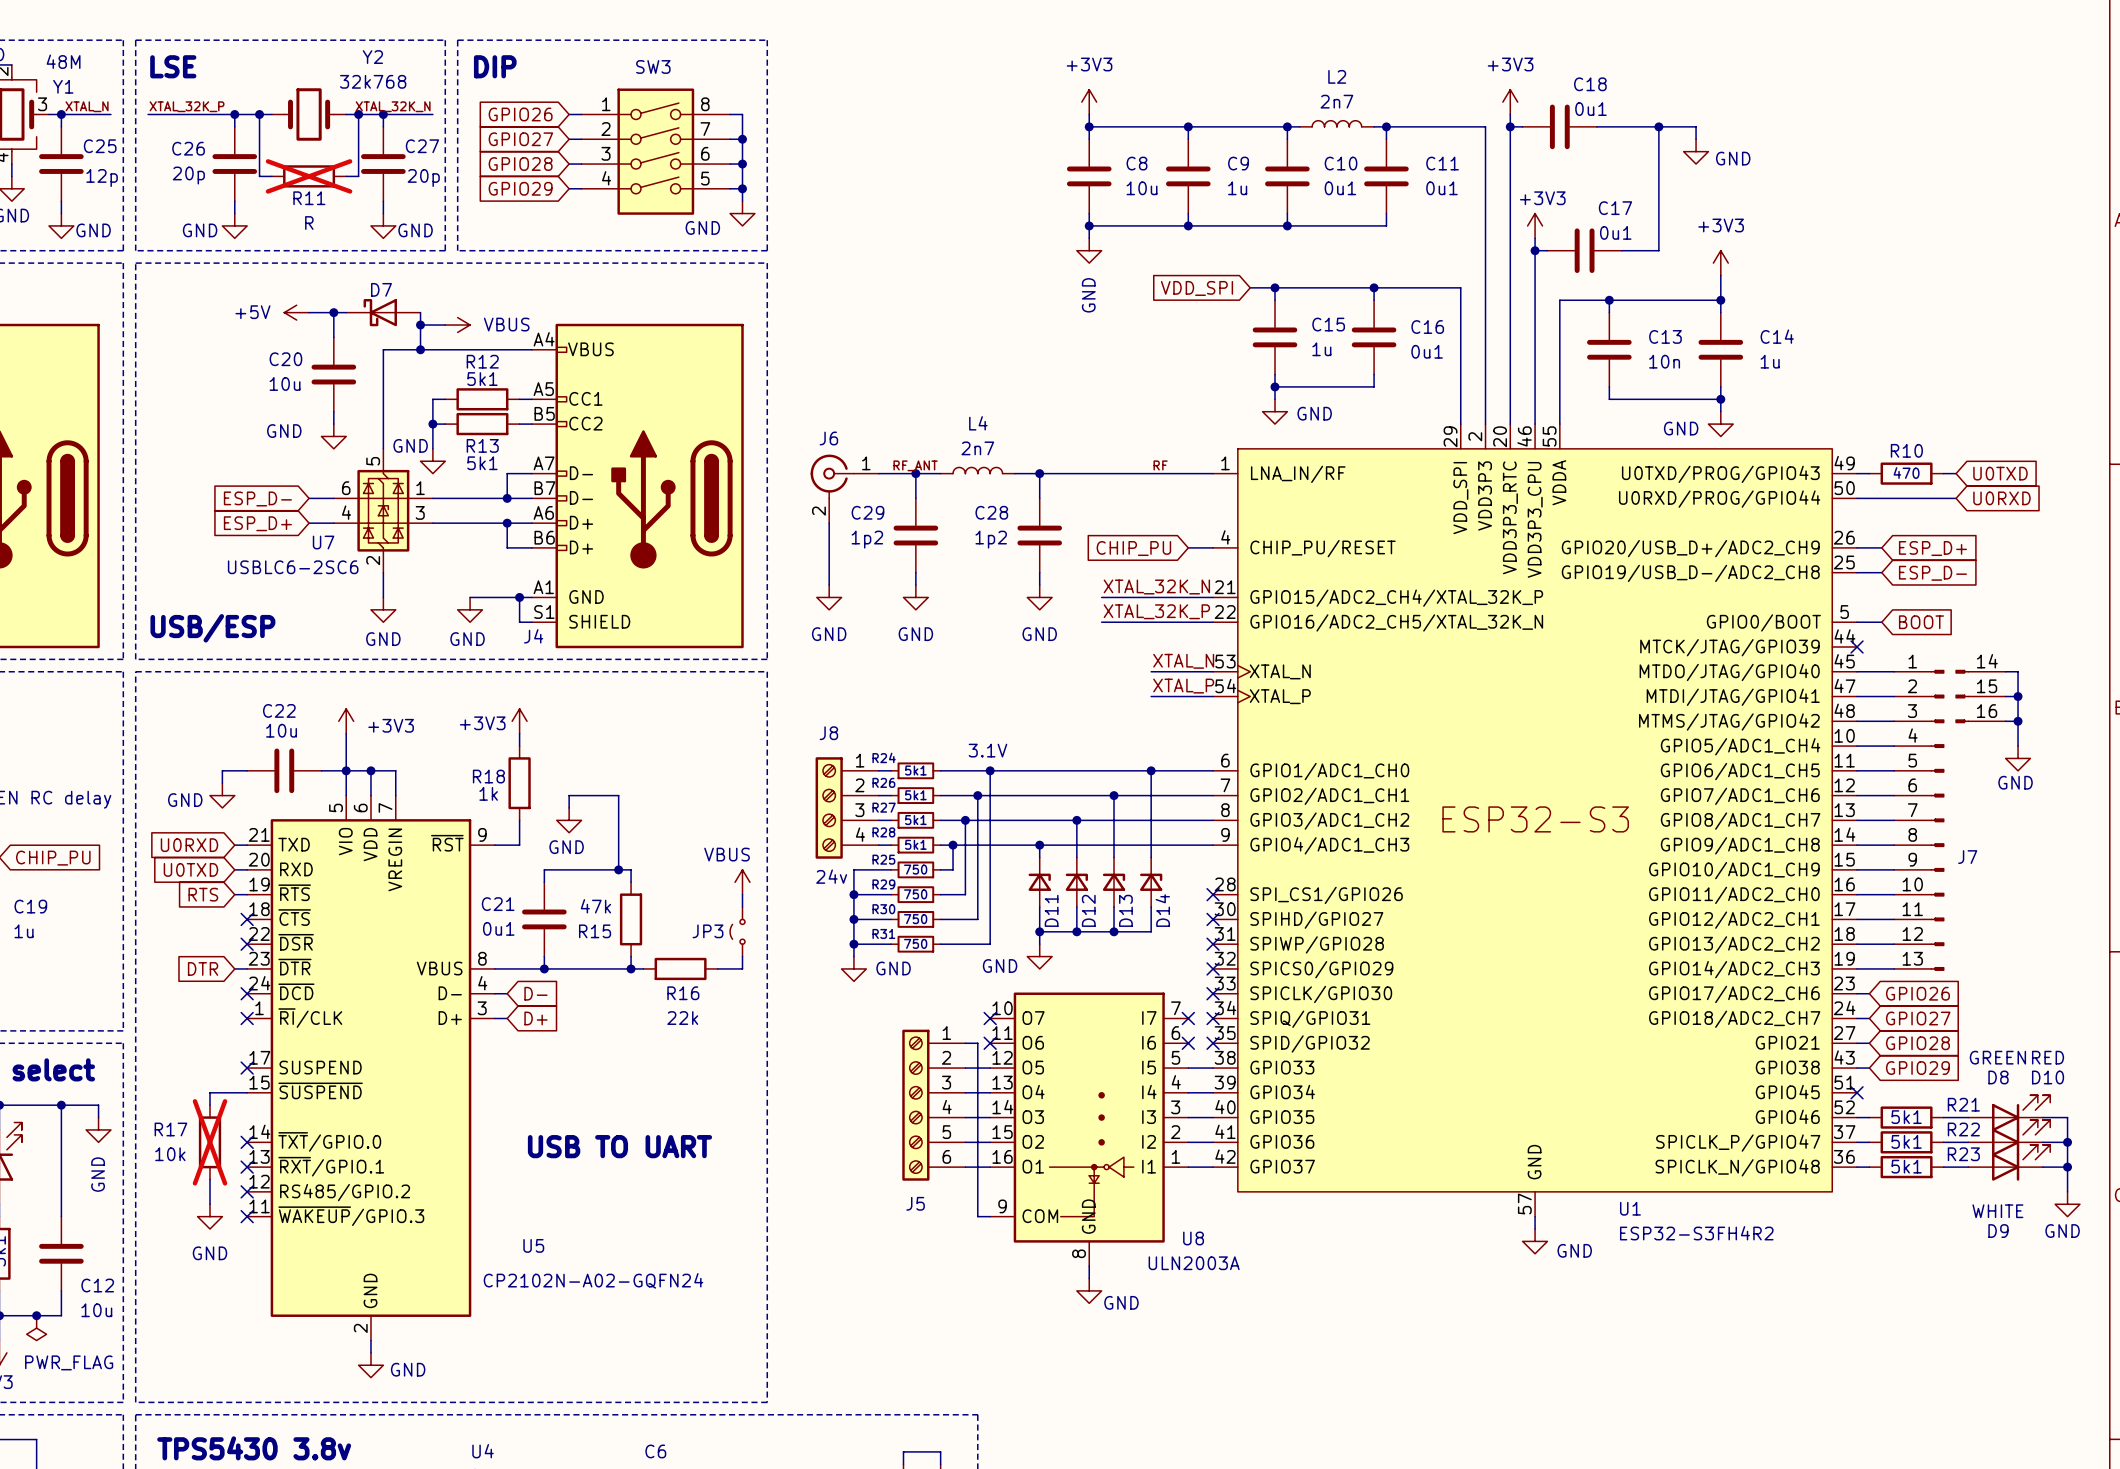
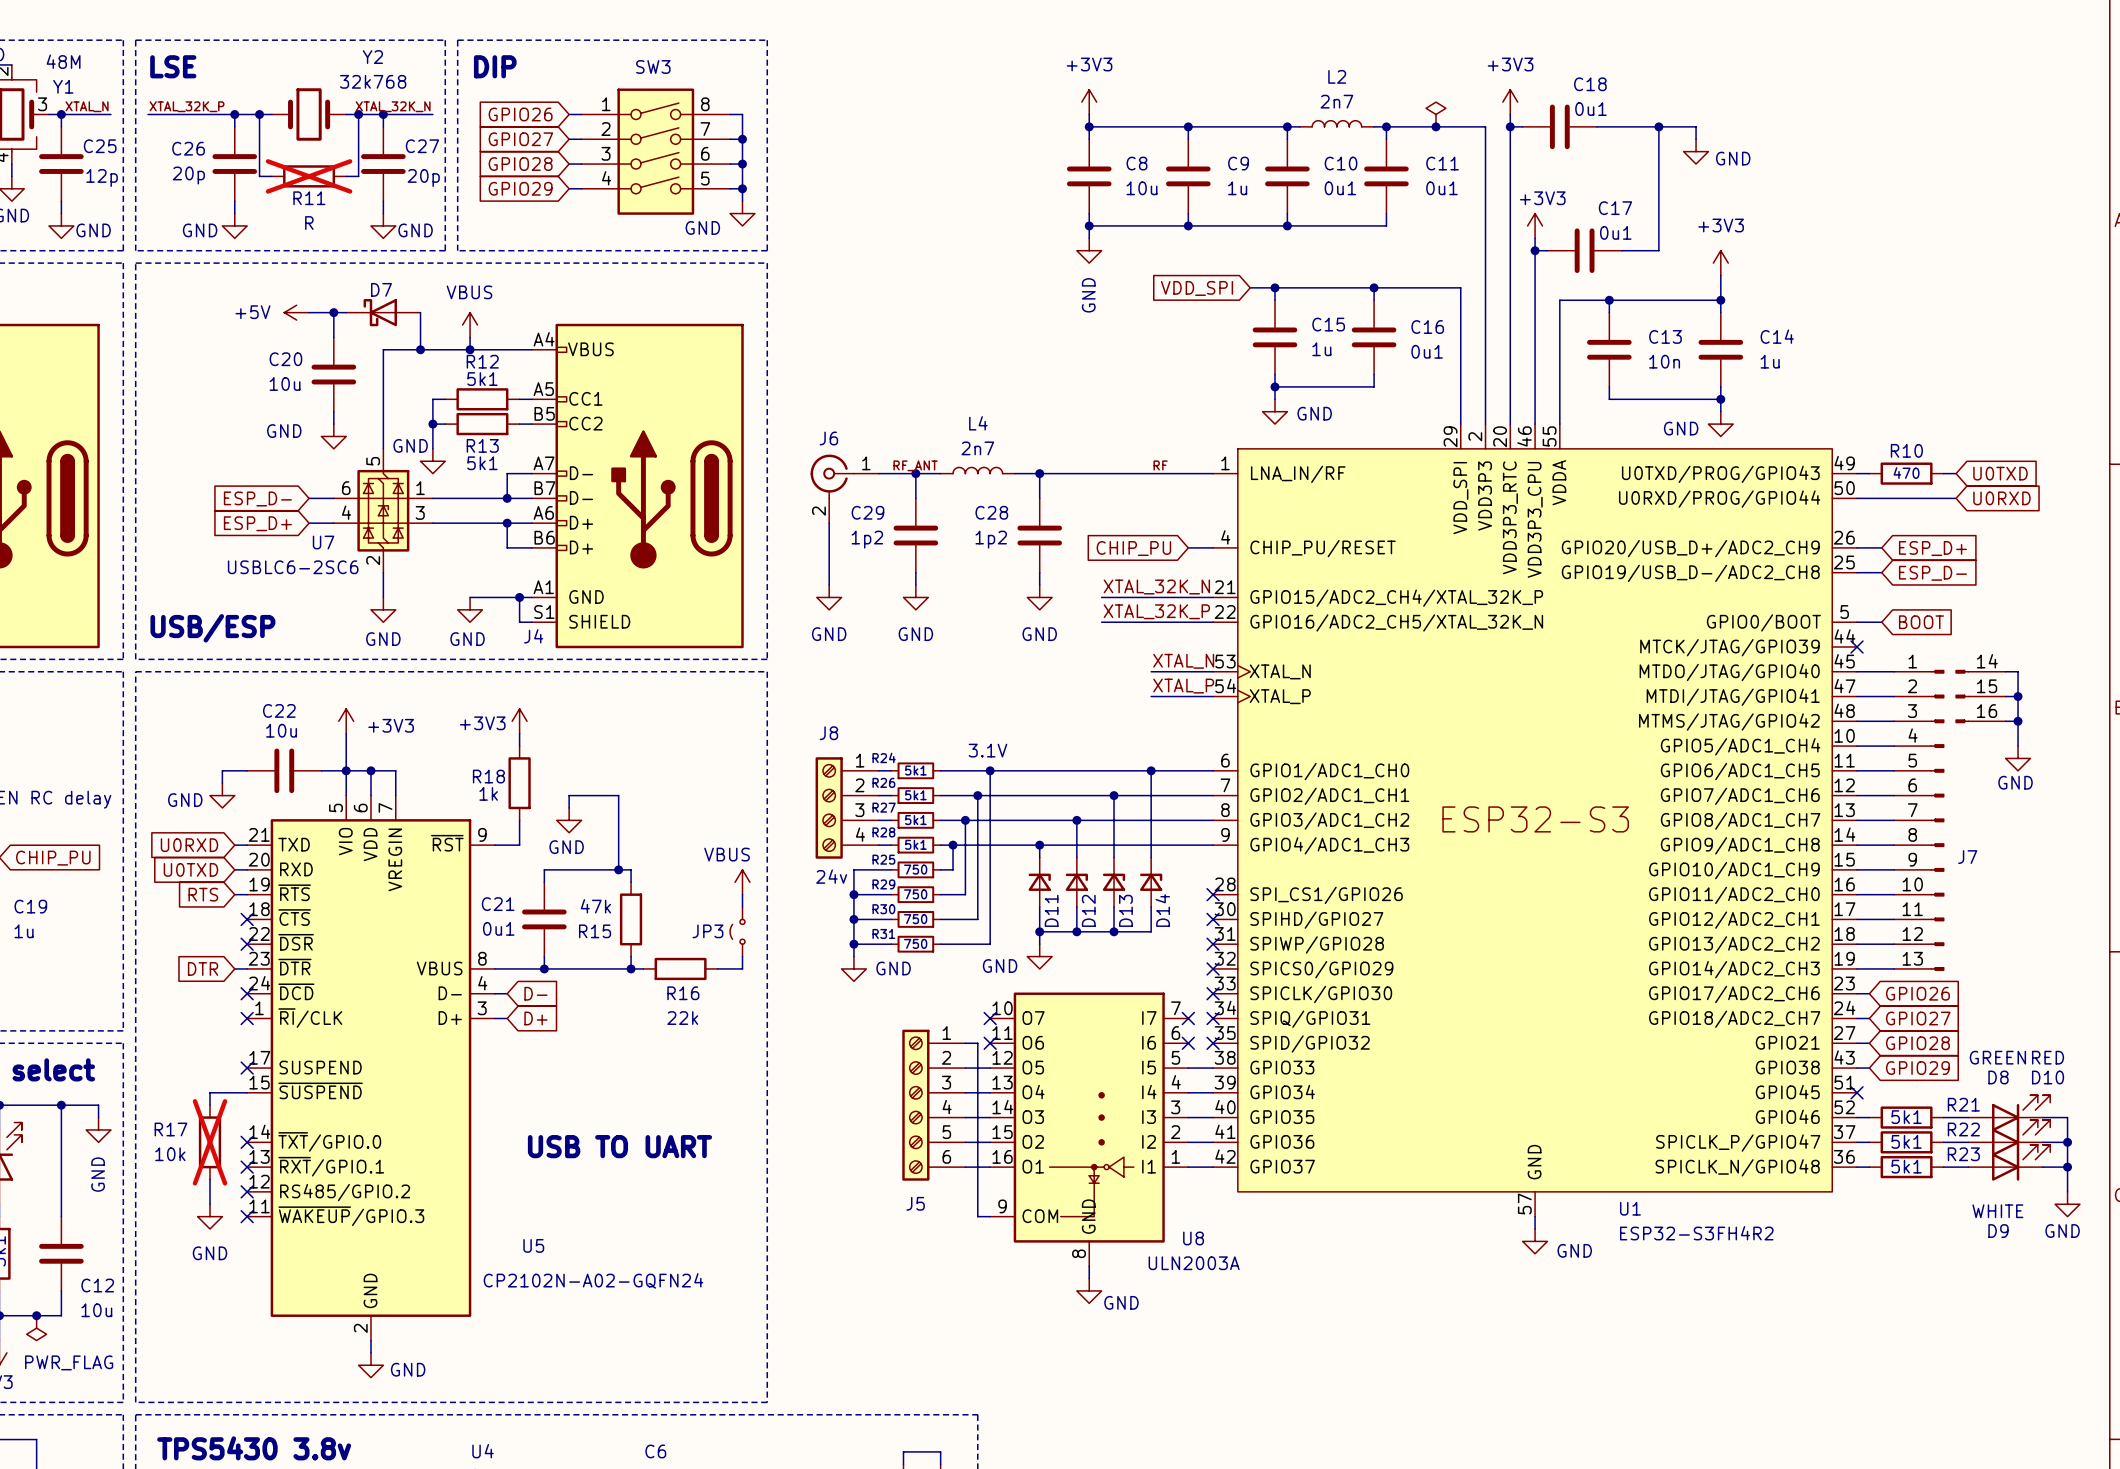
power symbol: none -> (1435, 114)
junction: none -> (1435, 126)
power symbol text position: VBUS (506, 324) -> VBUS (469, 292)
wire: (420, 325) (445, 325) -> none
junction position: (420, 325) -> (470, 349)
power symbol rotation: 0° (457, 325) -> 90° counterclockwise (470, 325)
wire: none -> (470, 337) (470, 349)

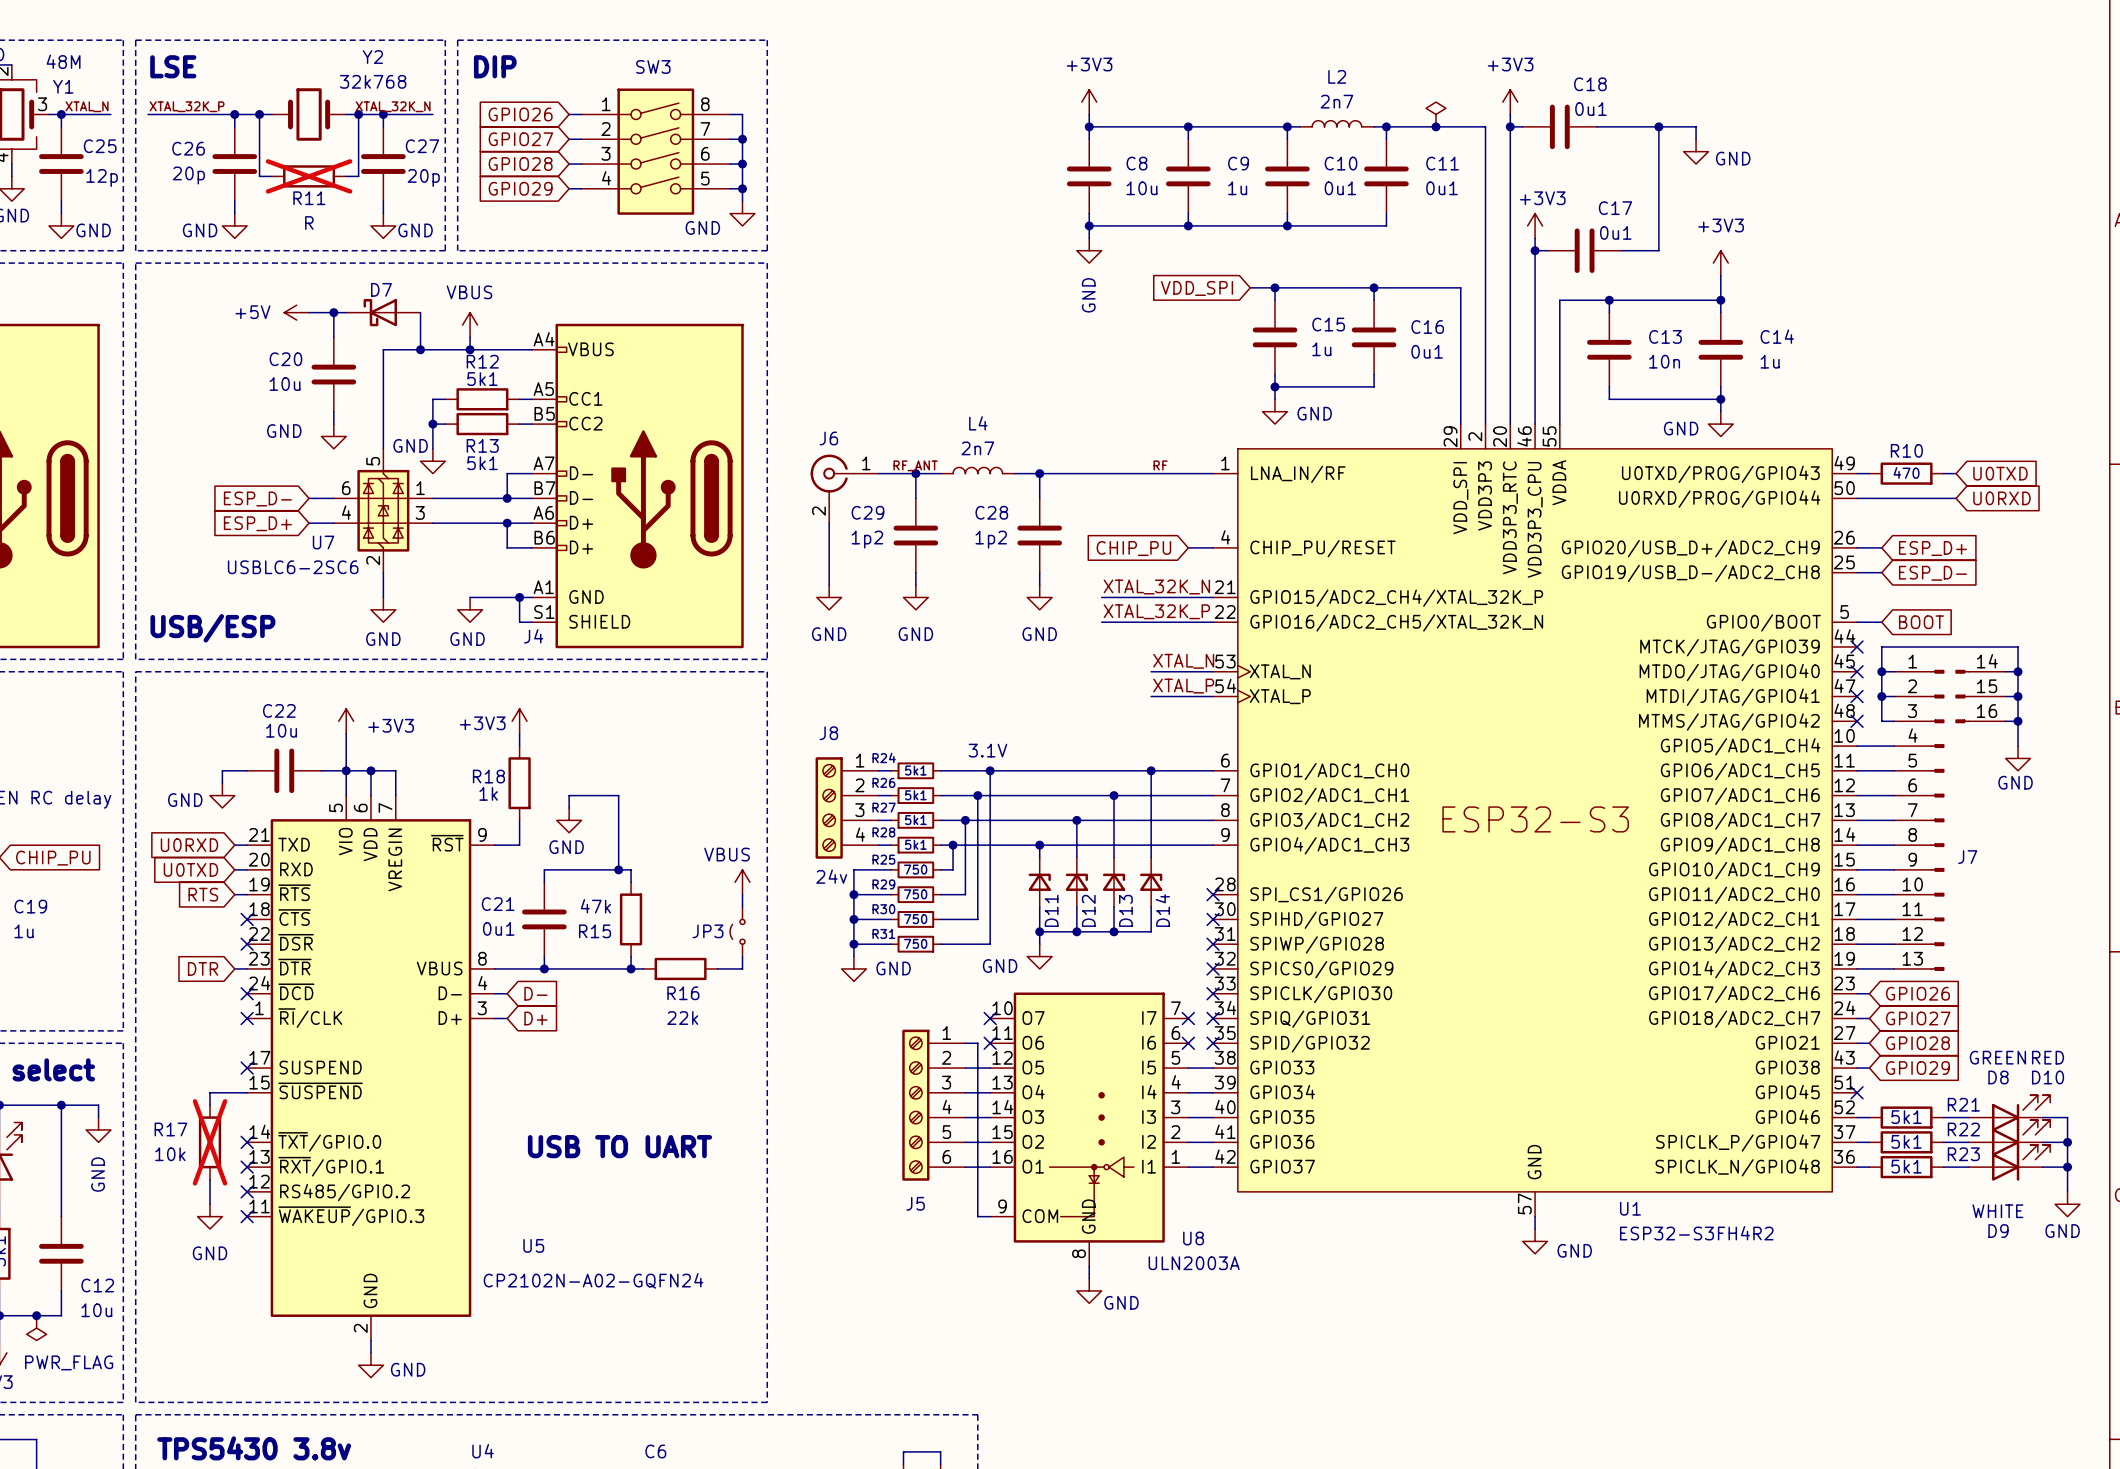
wire: (1857, 671) (1881, 671) -> none
no-connect mark: none -> (1857, 671)
junction: none -> (1881, 671)
junction: none -> (2018, 671)
wire: (1857, 696) (1881, 696) -> none
no-connect mark: none -> (1857, 696)
junction: none -> (1881, 696)
wire: (1857, 721) (1881, 721) -> (2018, 671) (2018, 646) (1881, 646) (1881, 721)
no-connect mark: none -> (1857, 721)

